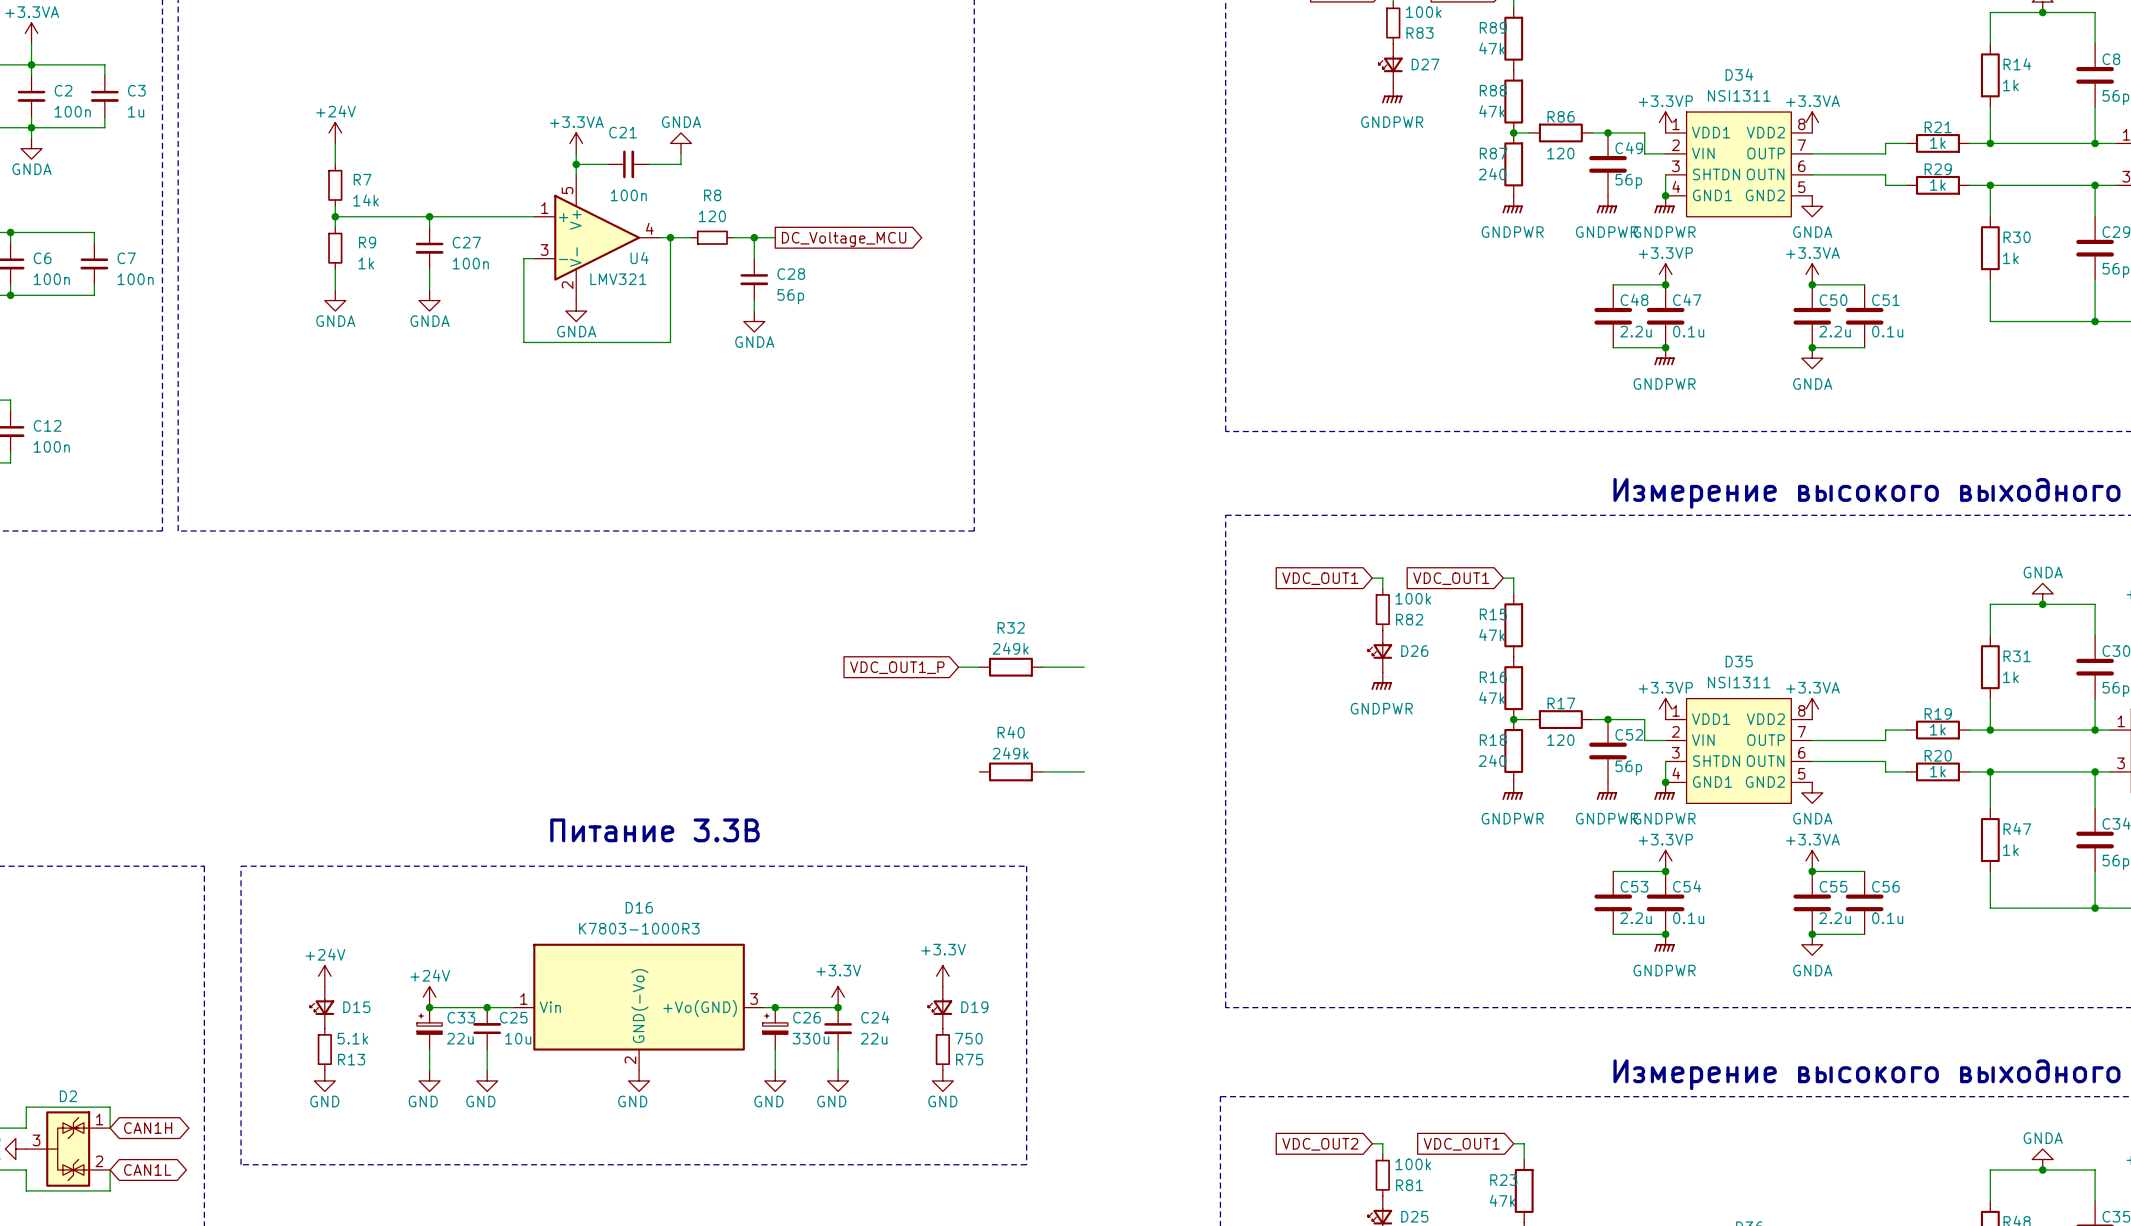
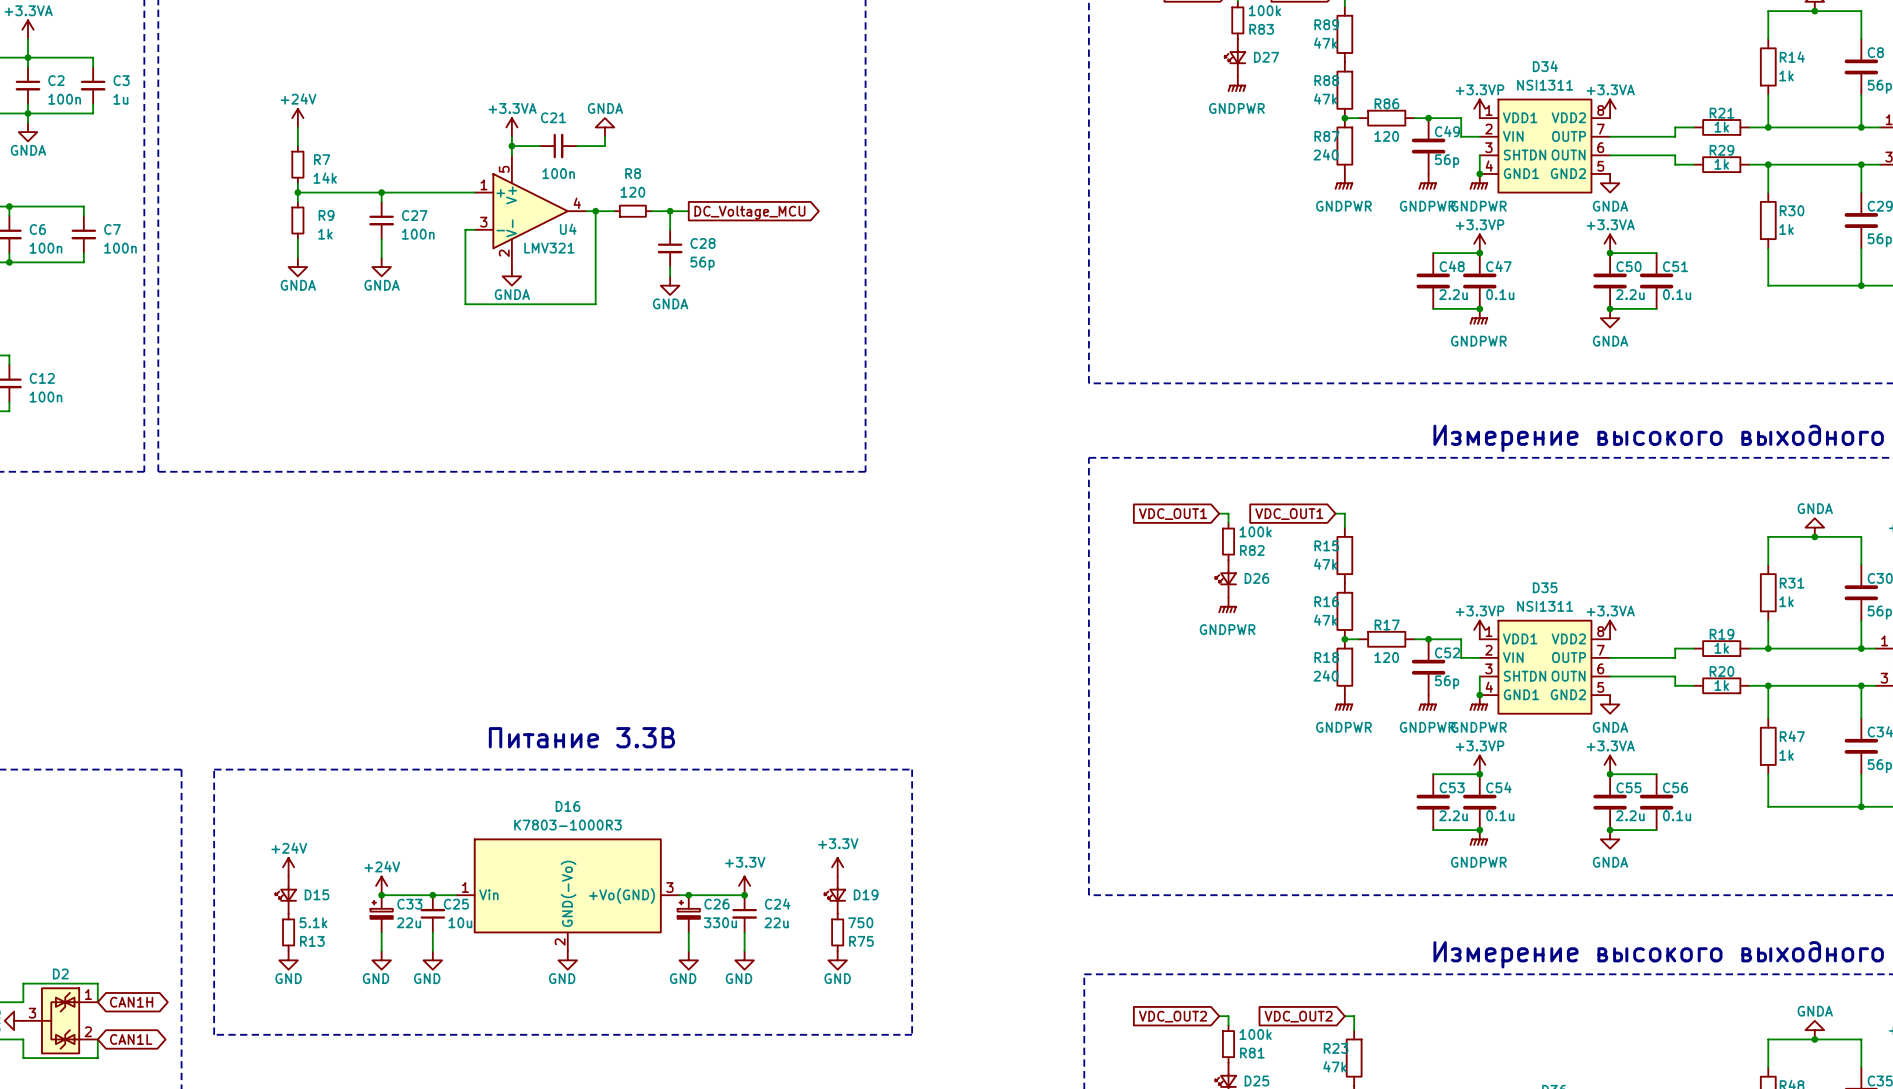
global label: VDC_OUT1_P (897, 667) -> none
wire: (958, 667) (979, 667) -> none
R32: 249k (1010, 667) -> none
wire: (1042, 667) (1084, 667) -> none
R40: 249k (1010, 771) -> none
wire: (1042, 771) (1084, 771) -> none
global label: VDC_OUT1 (1461, 1144) -> VDC_OUT2 (1298, 1016)

